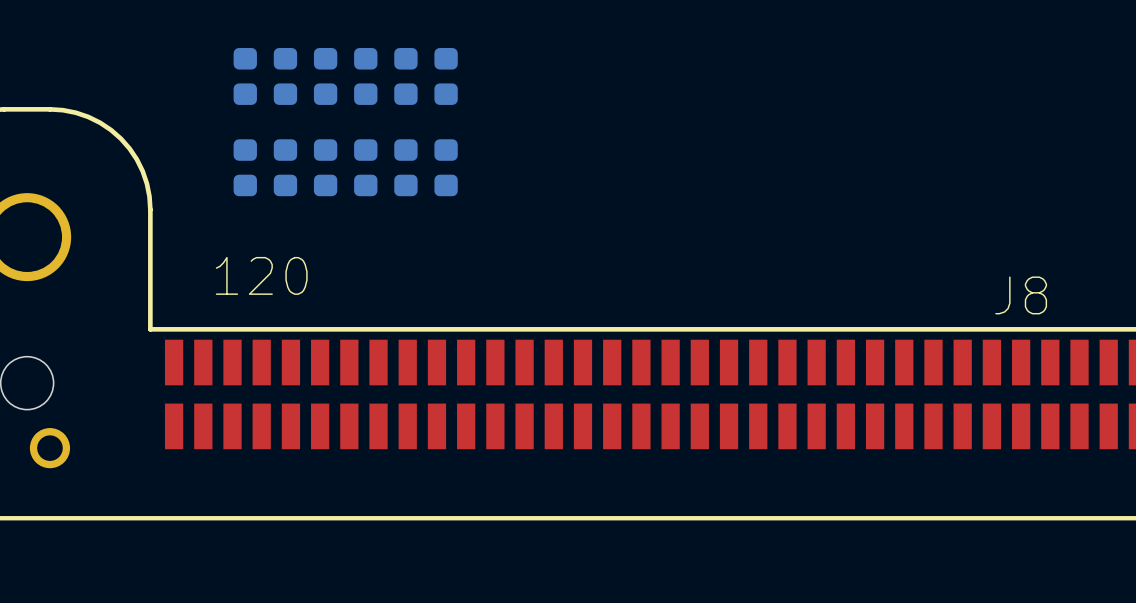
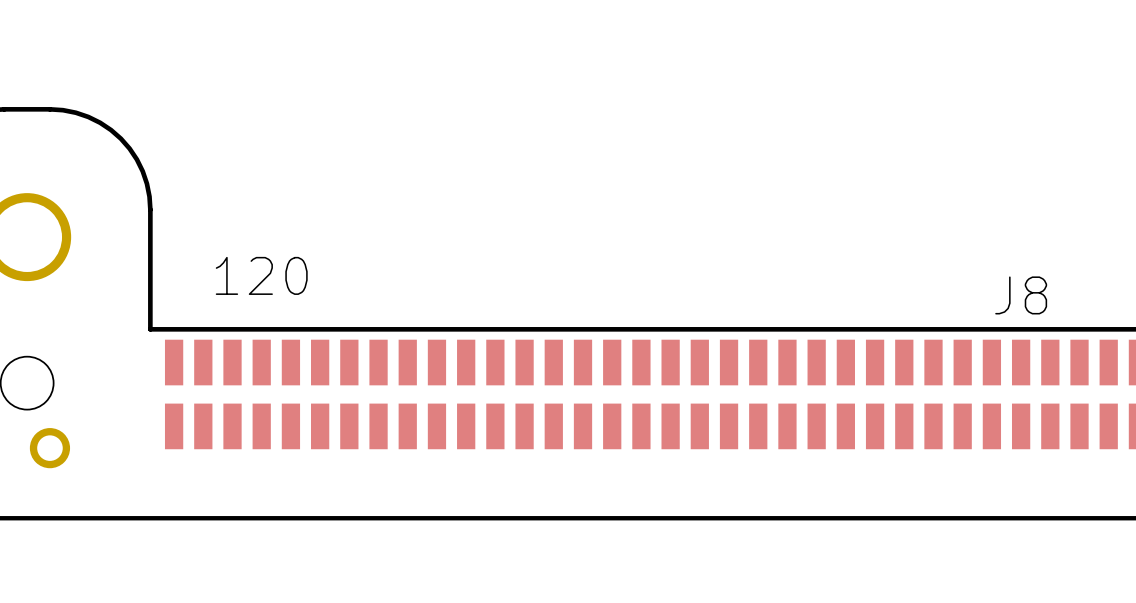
part: (245, 76) -> none
part: (285, 76) -> none
part: (325, 76) -> none
part: (365, 76) -> none
part: (405, 76) -> none
part: (446, 76) -> none
part: (245, 167) -> none
part: (285, 167) -> none
part: (325, 167) -> none
part: (365, 167) -> none
part: (405, 167) -> none
part: (446, 167) -> none

